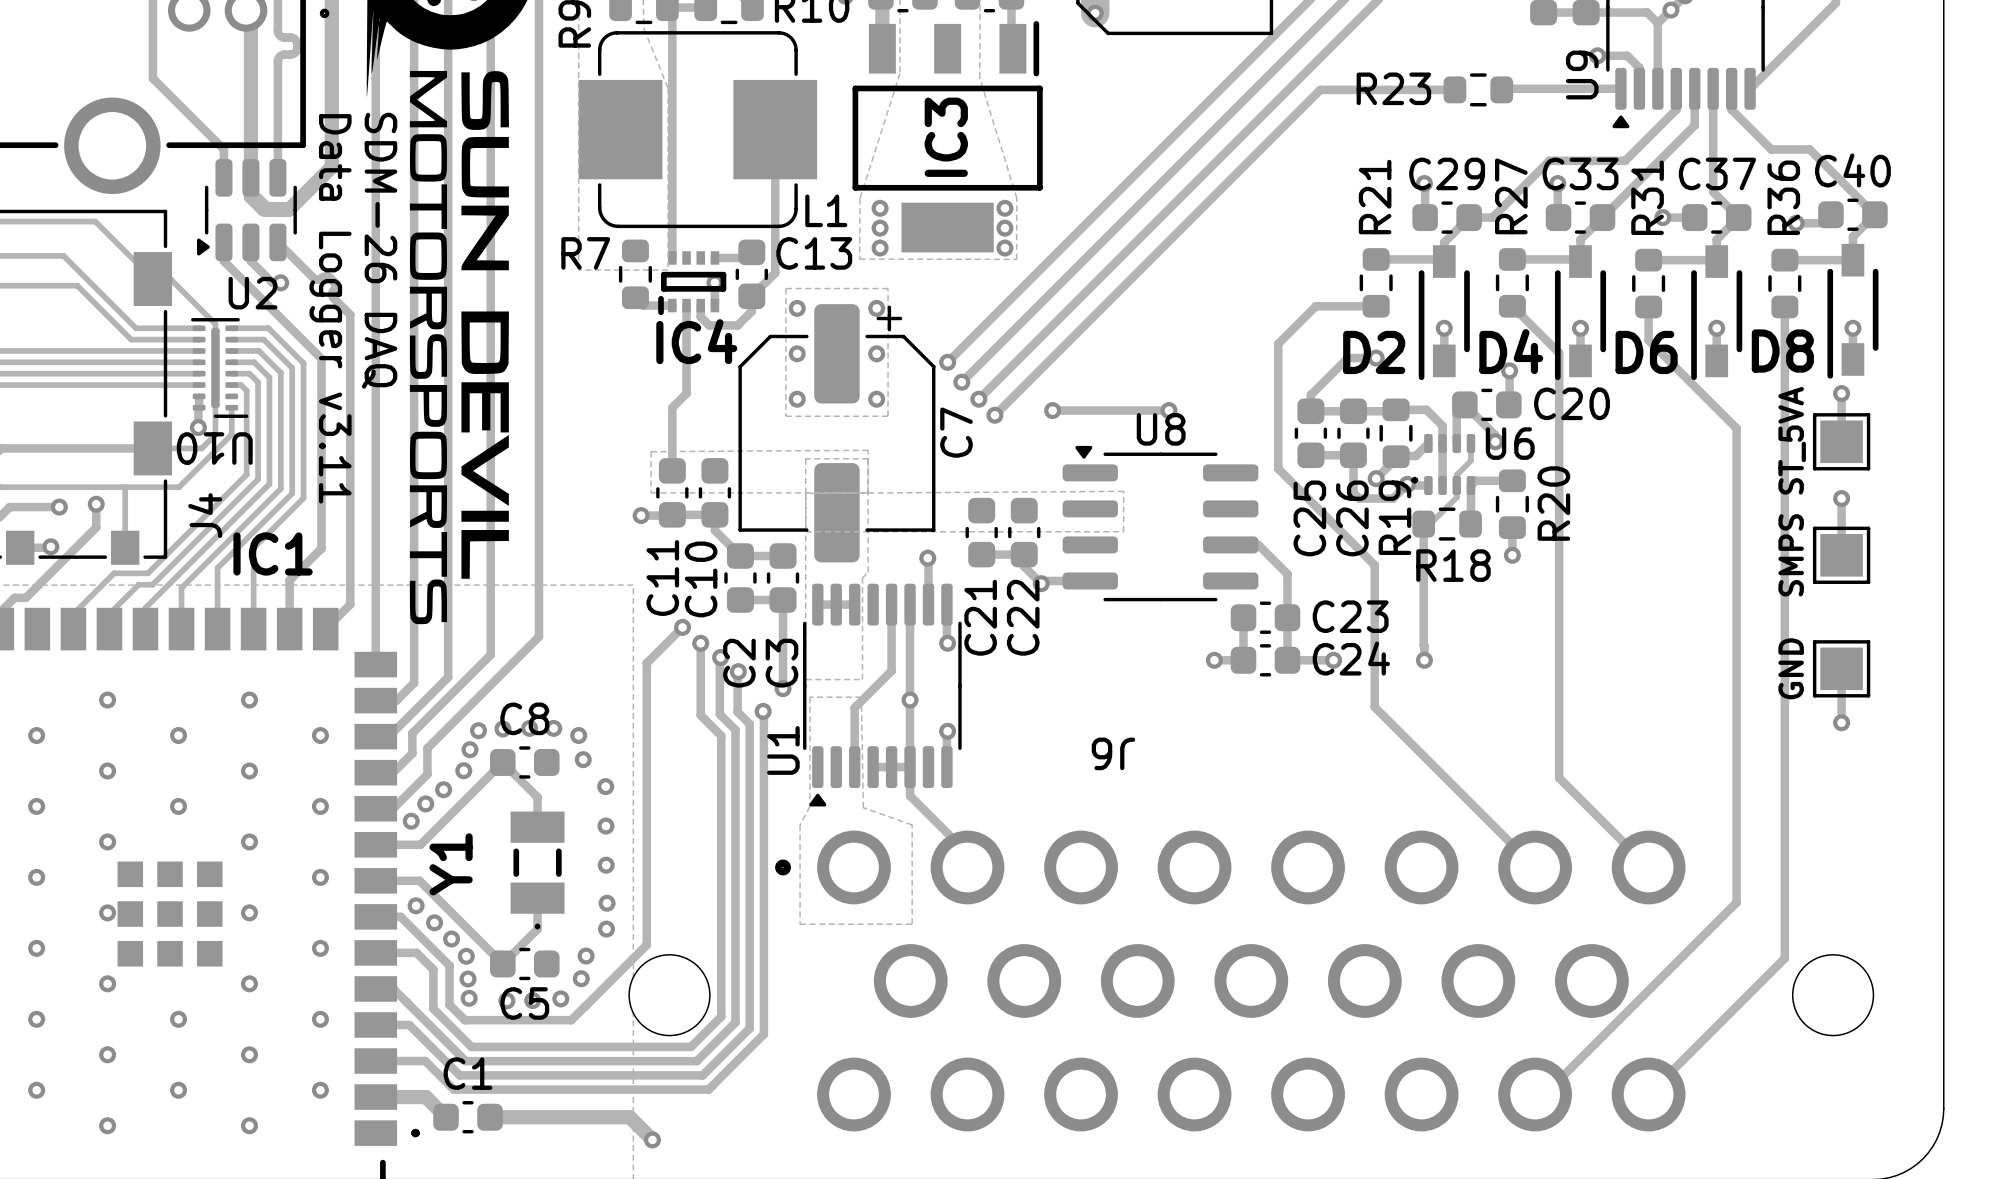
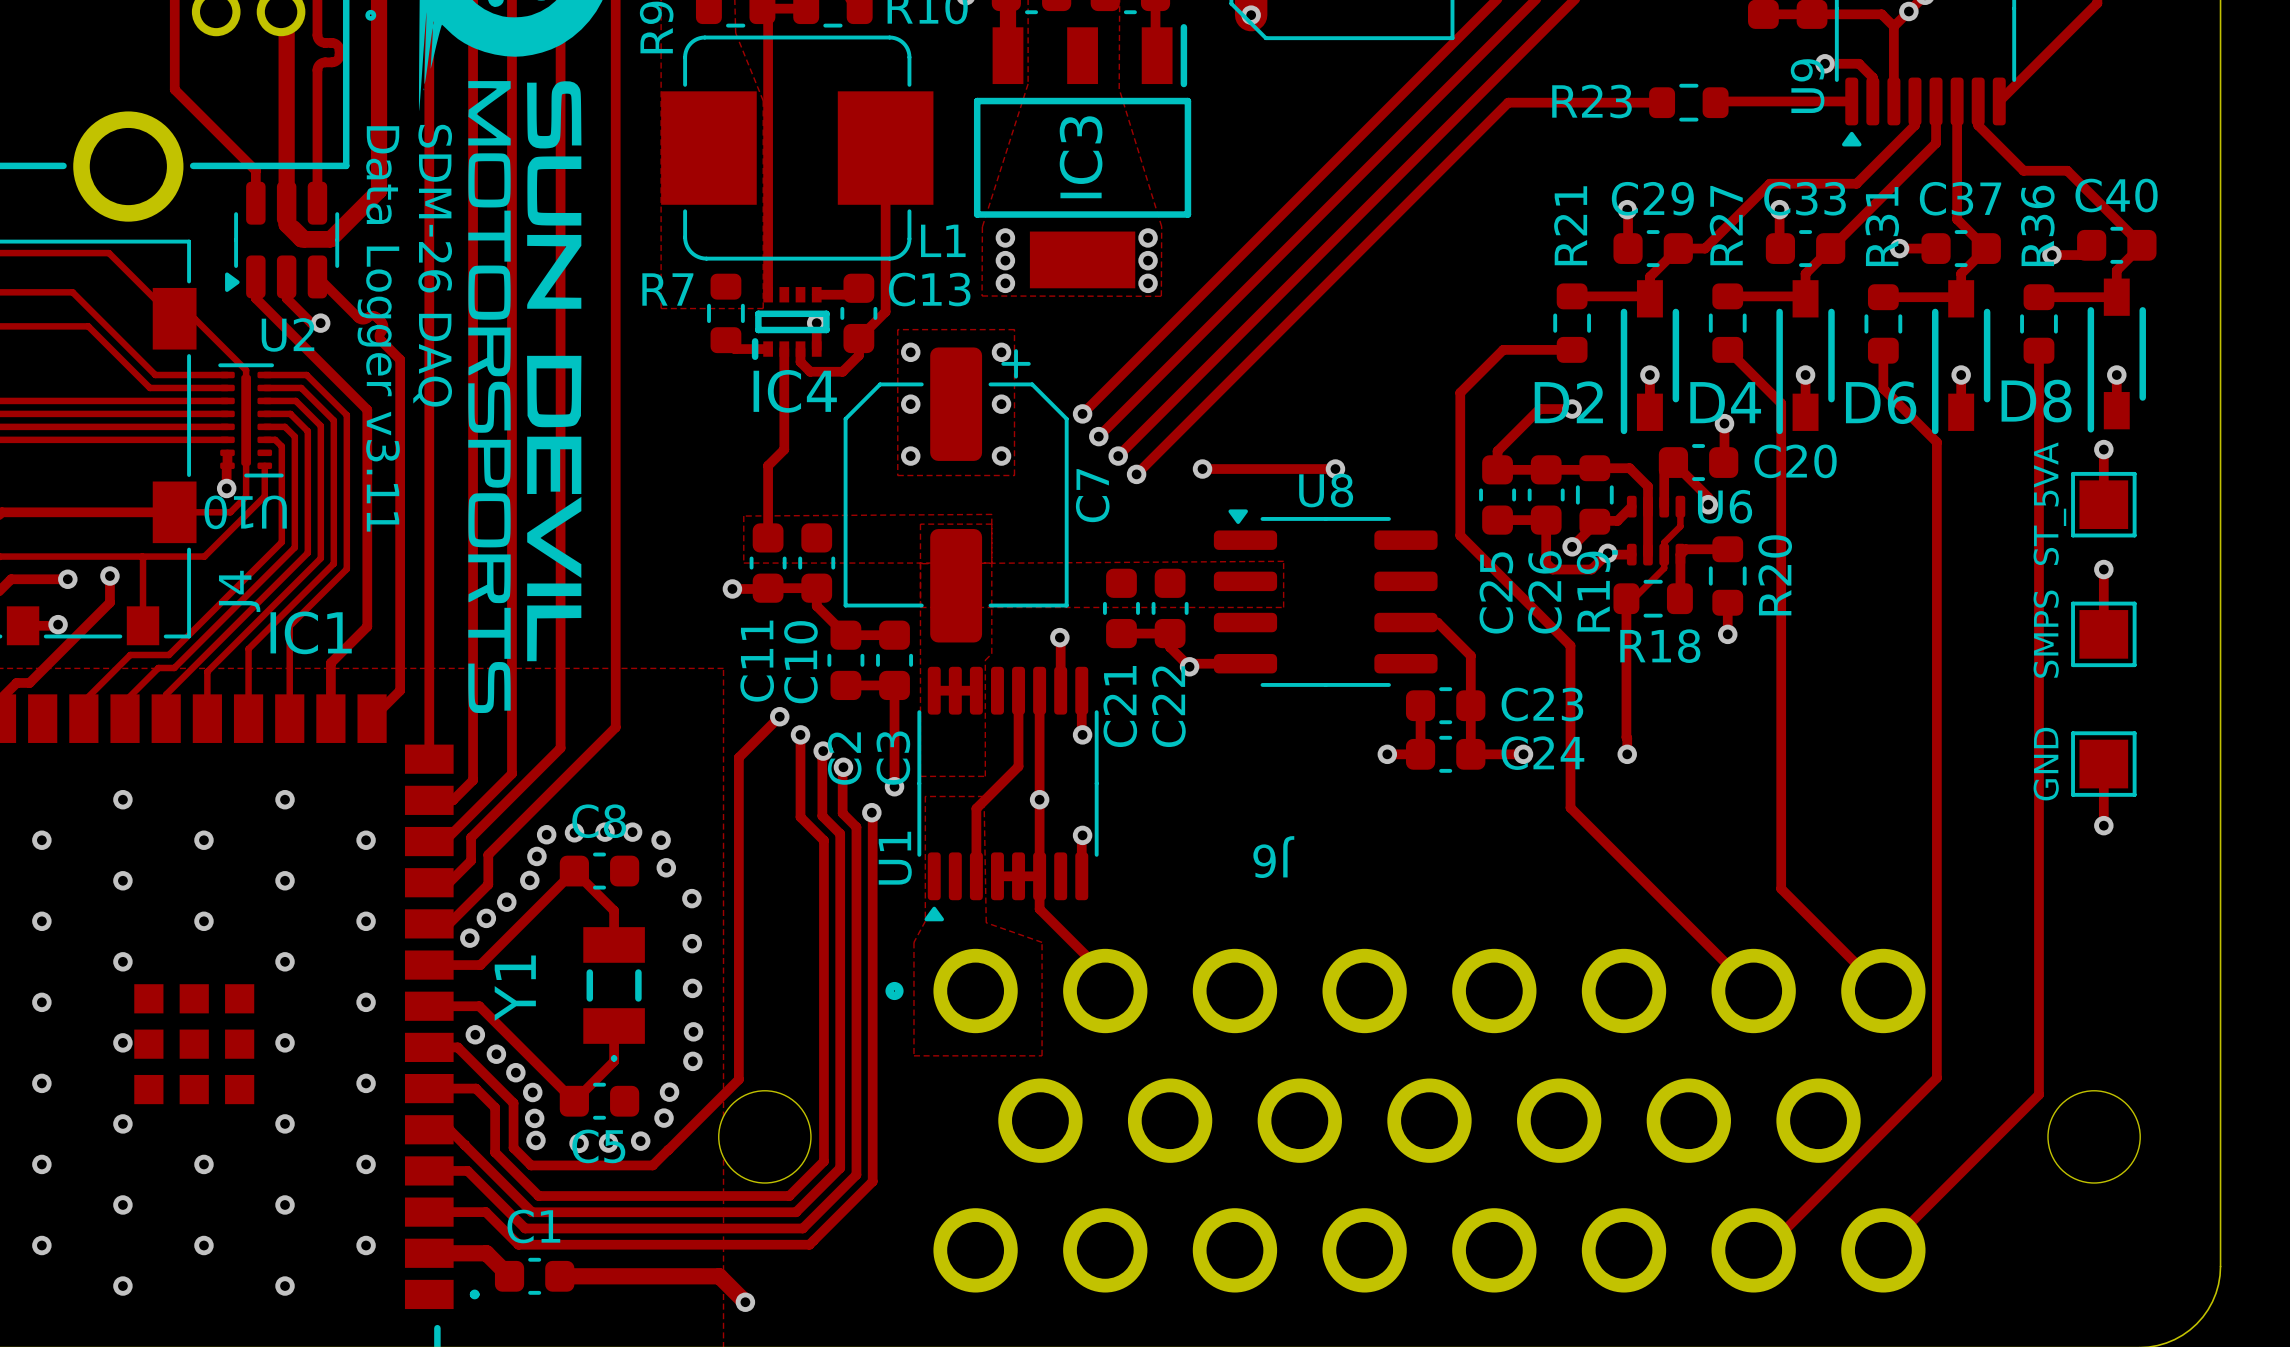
track: (1695, 387) (1736, 428) (1736, 902) (1695, 943) -> (1936, 442) (1936, 1078)

